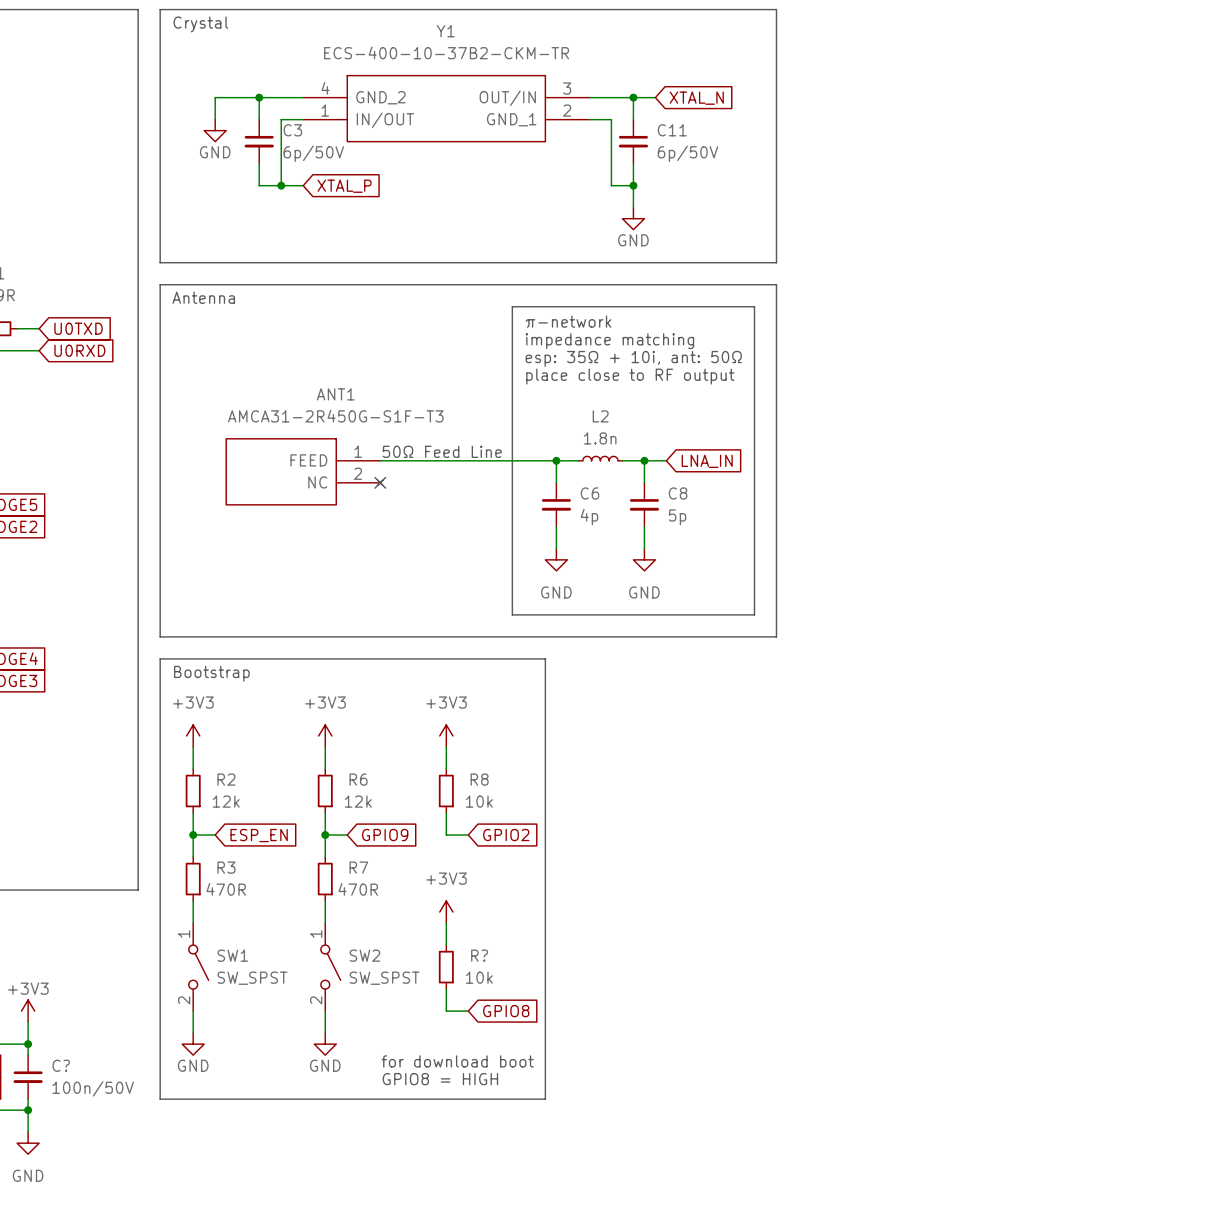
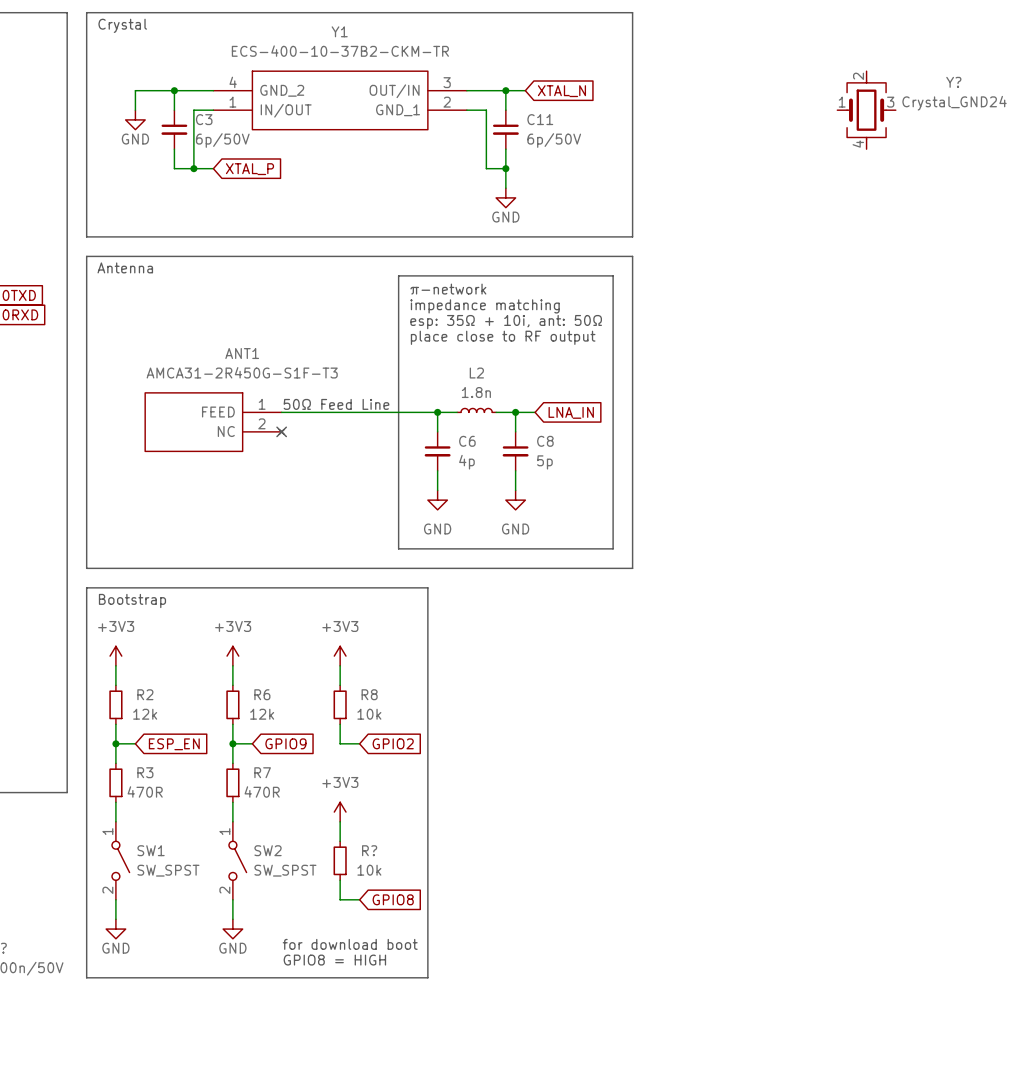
Y?: none -> Crystal_GND24 (866, 110)

